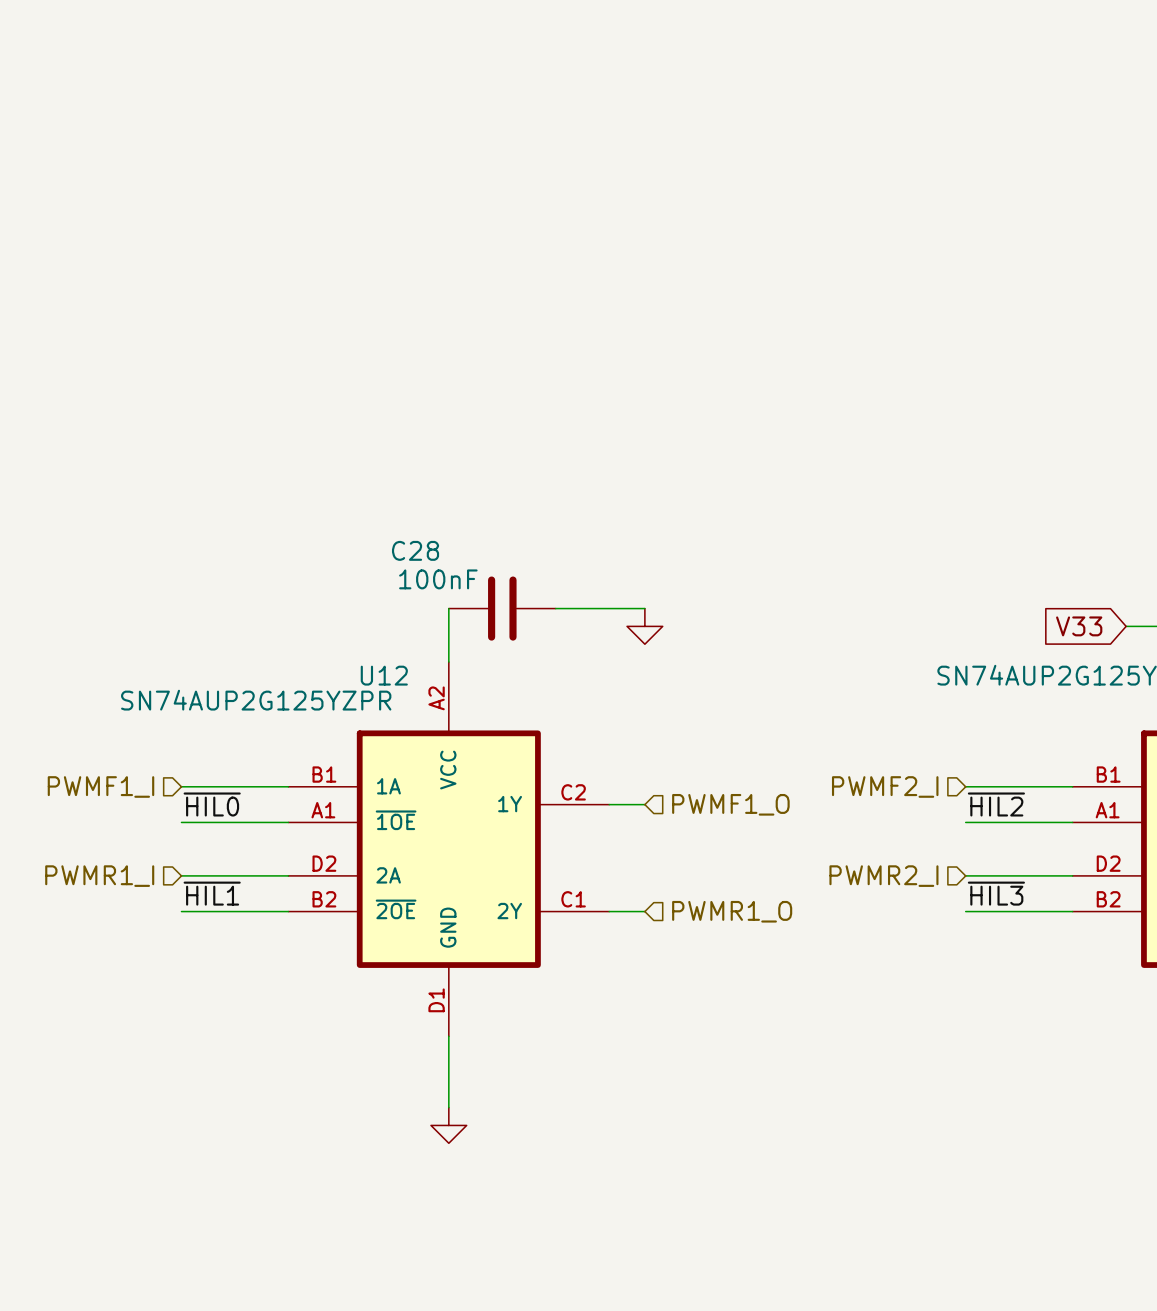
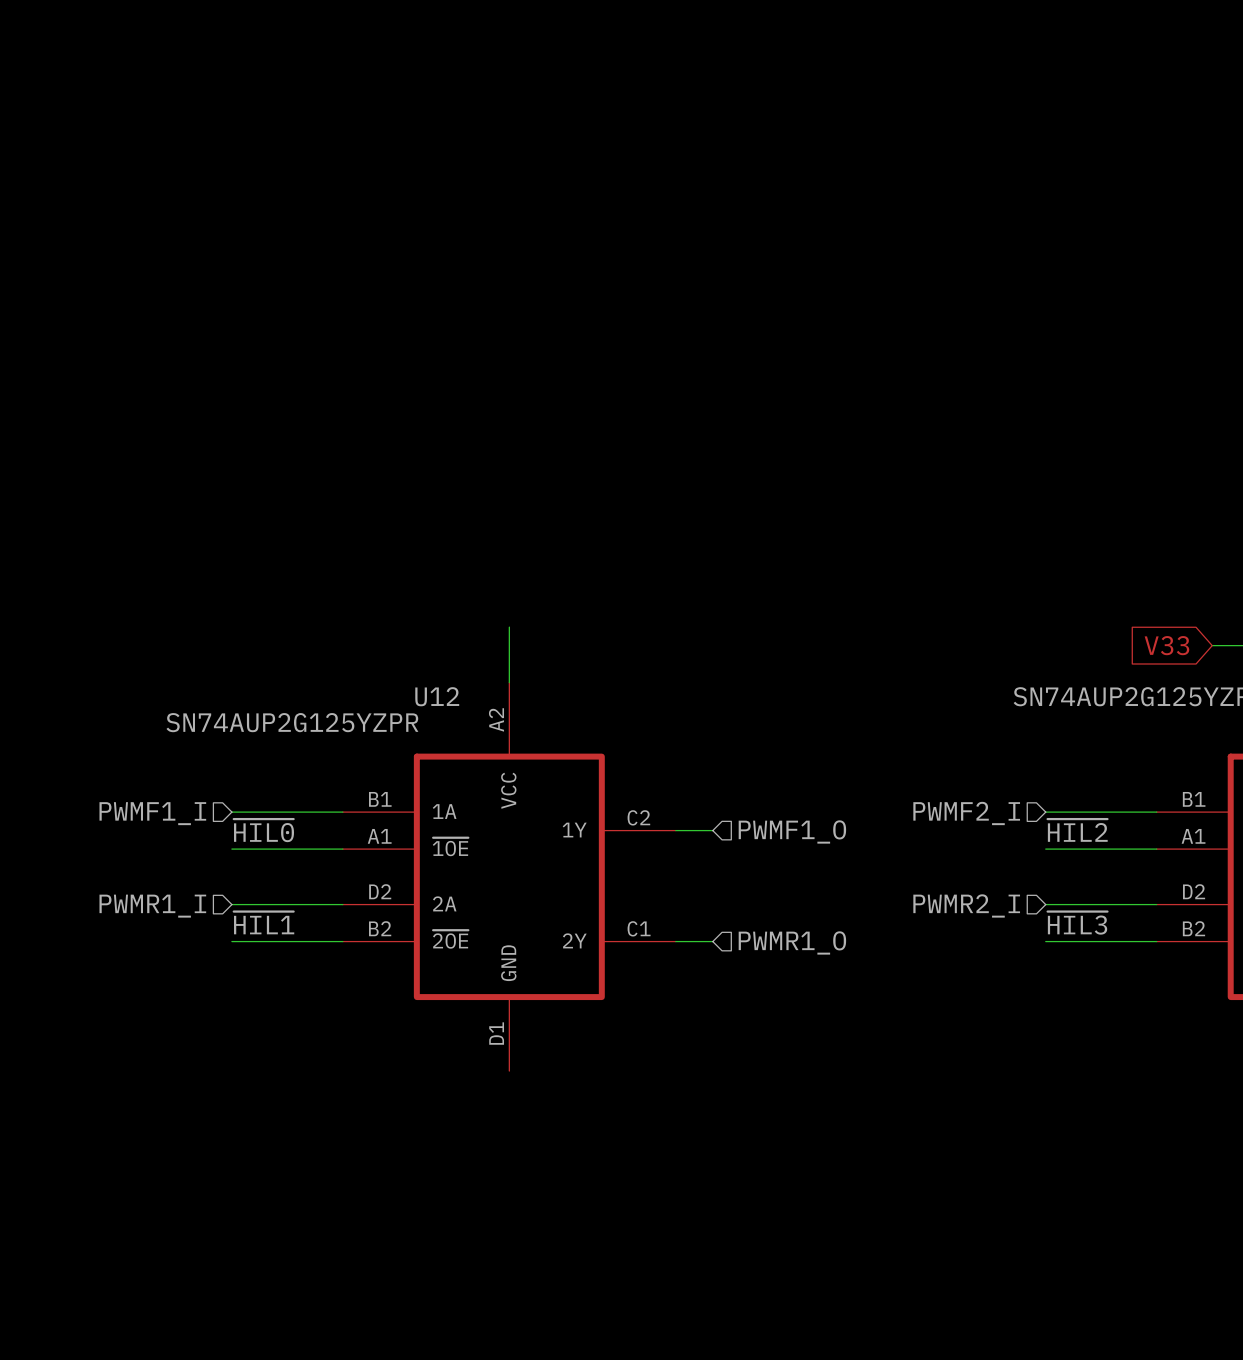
C28: 100nF (502, 608) -> none
wire: (555, 608) (644, 608) -> none
power symbol: (644, 626) -> none
wire: (448, 1036) (448, 1107) -> none
power symbol: (448, 1125) -> none

